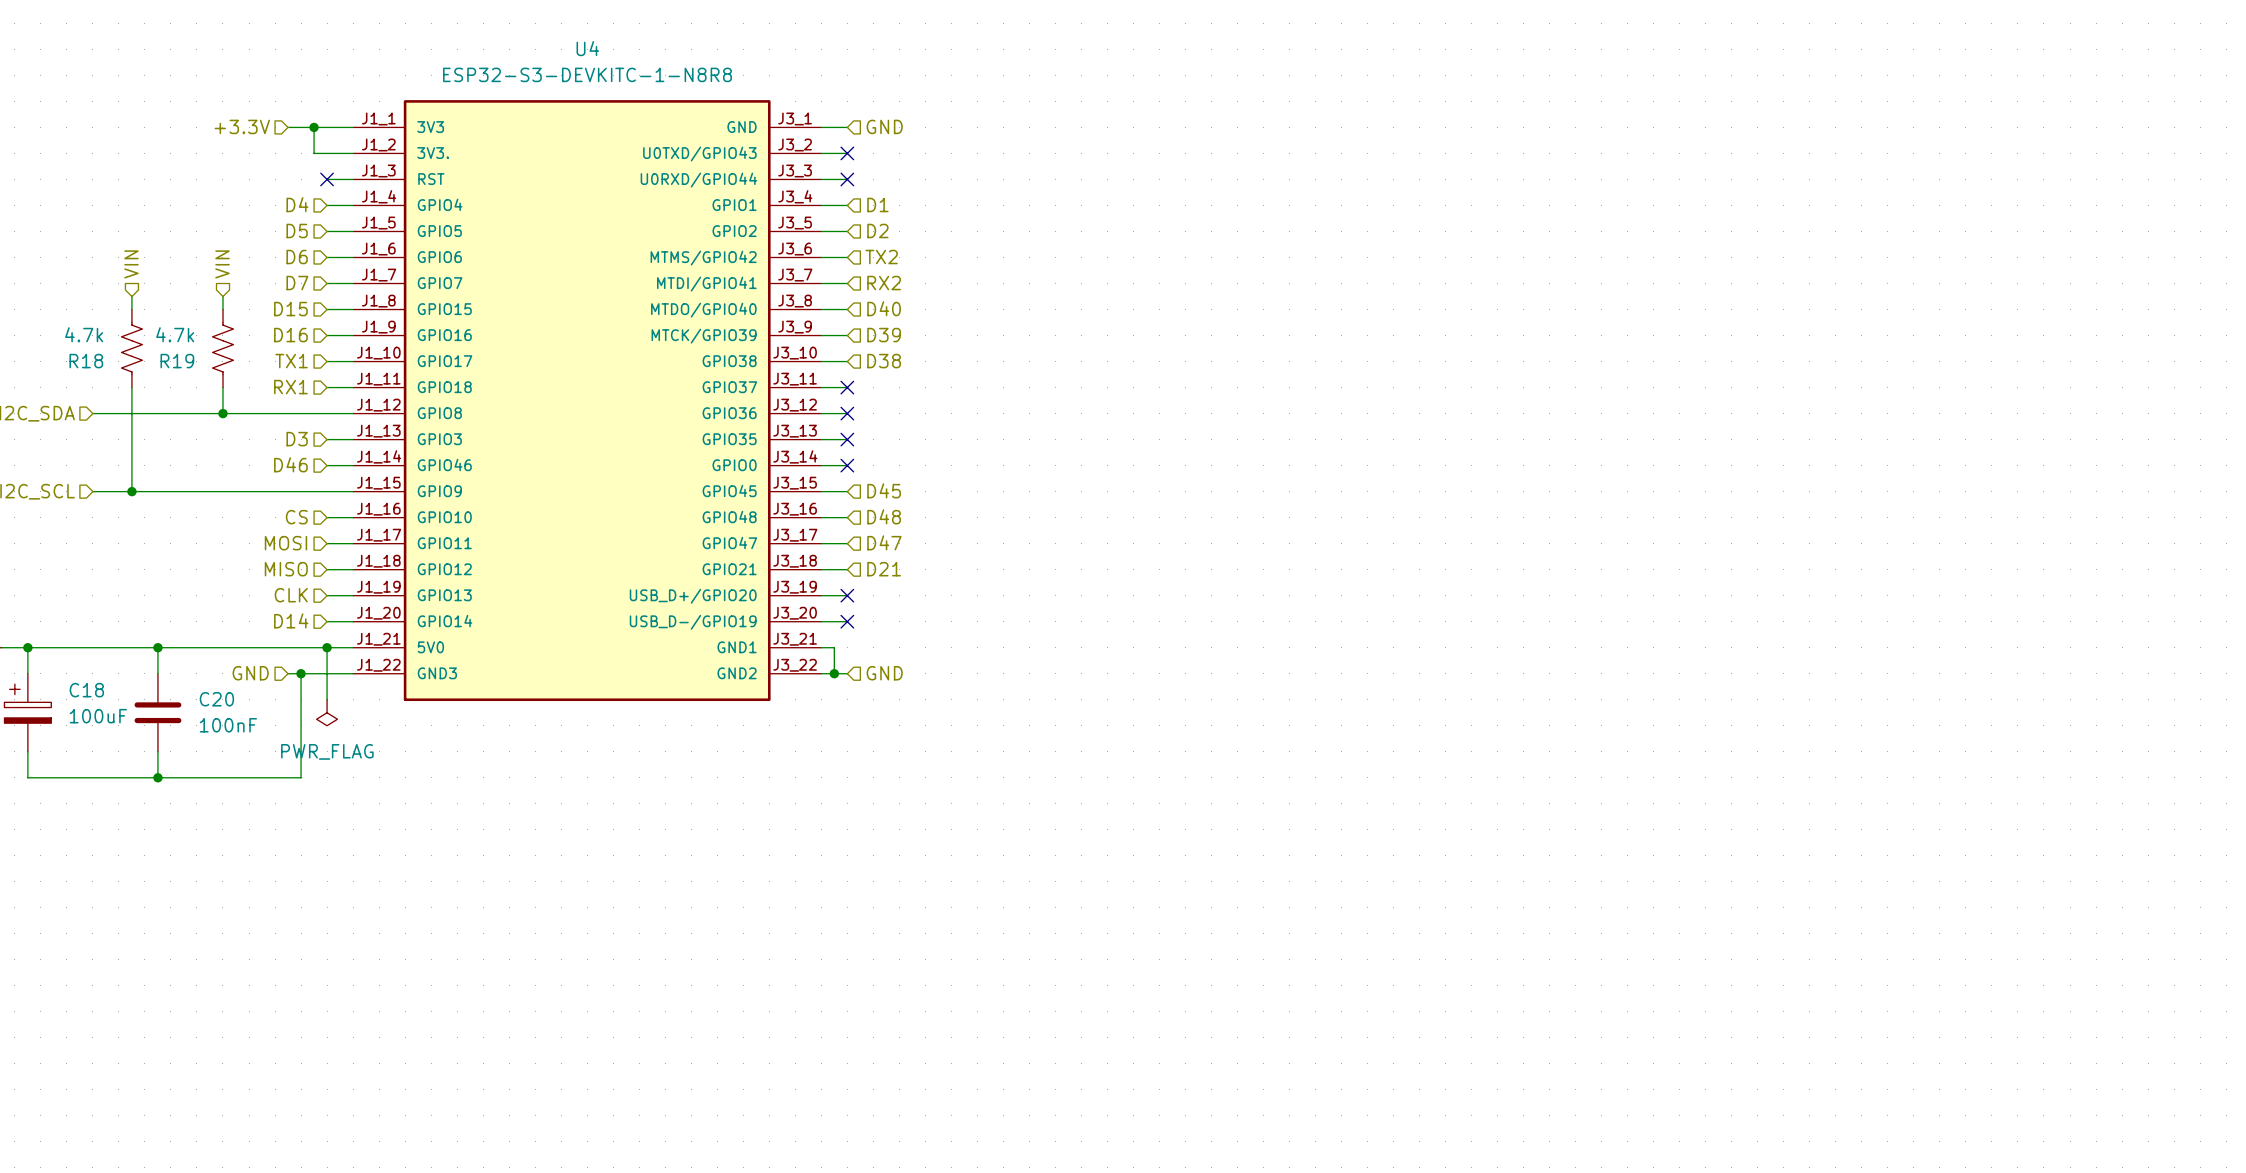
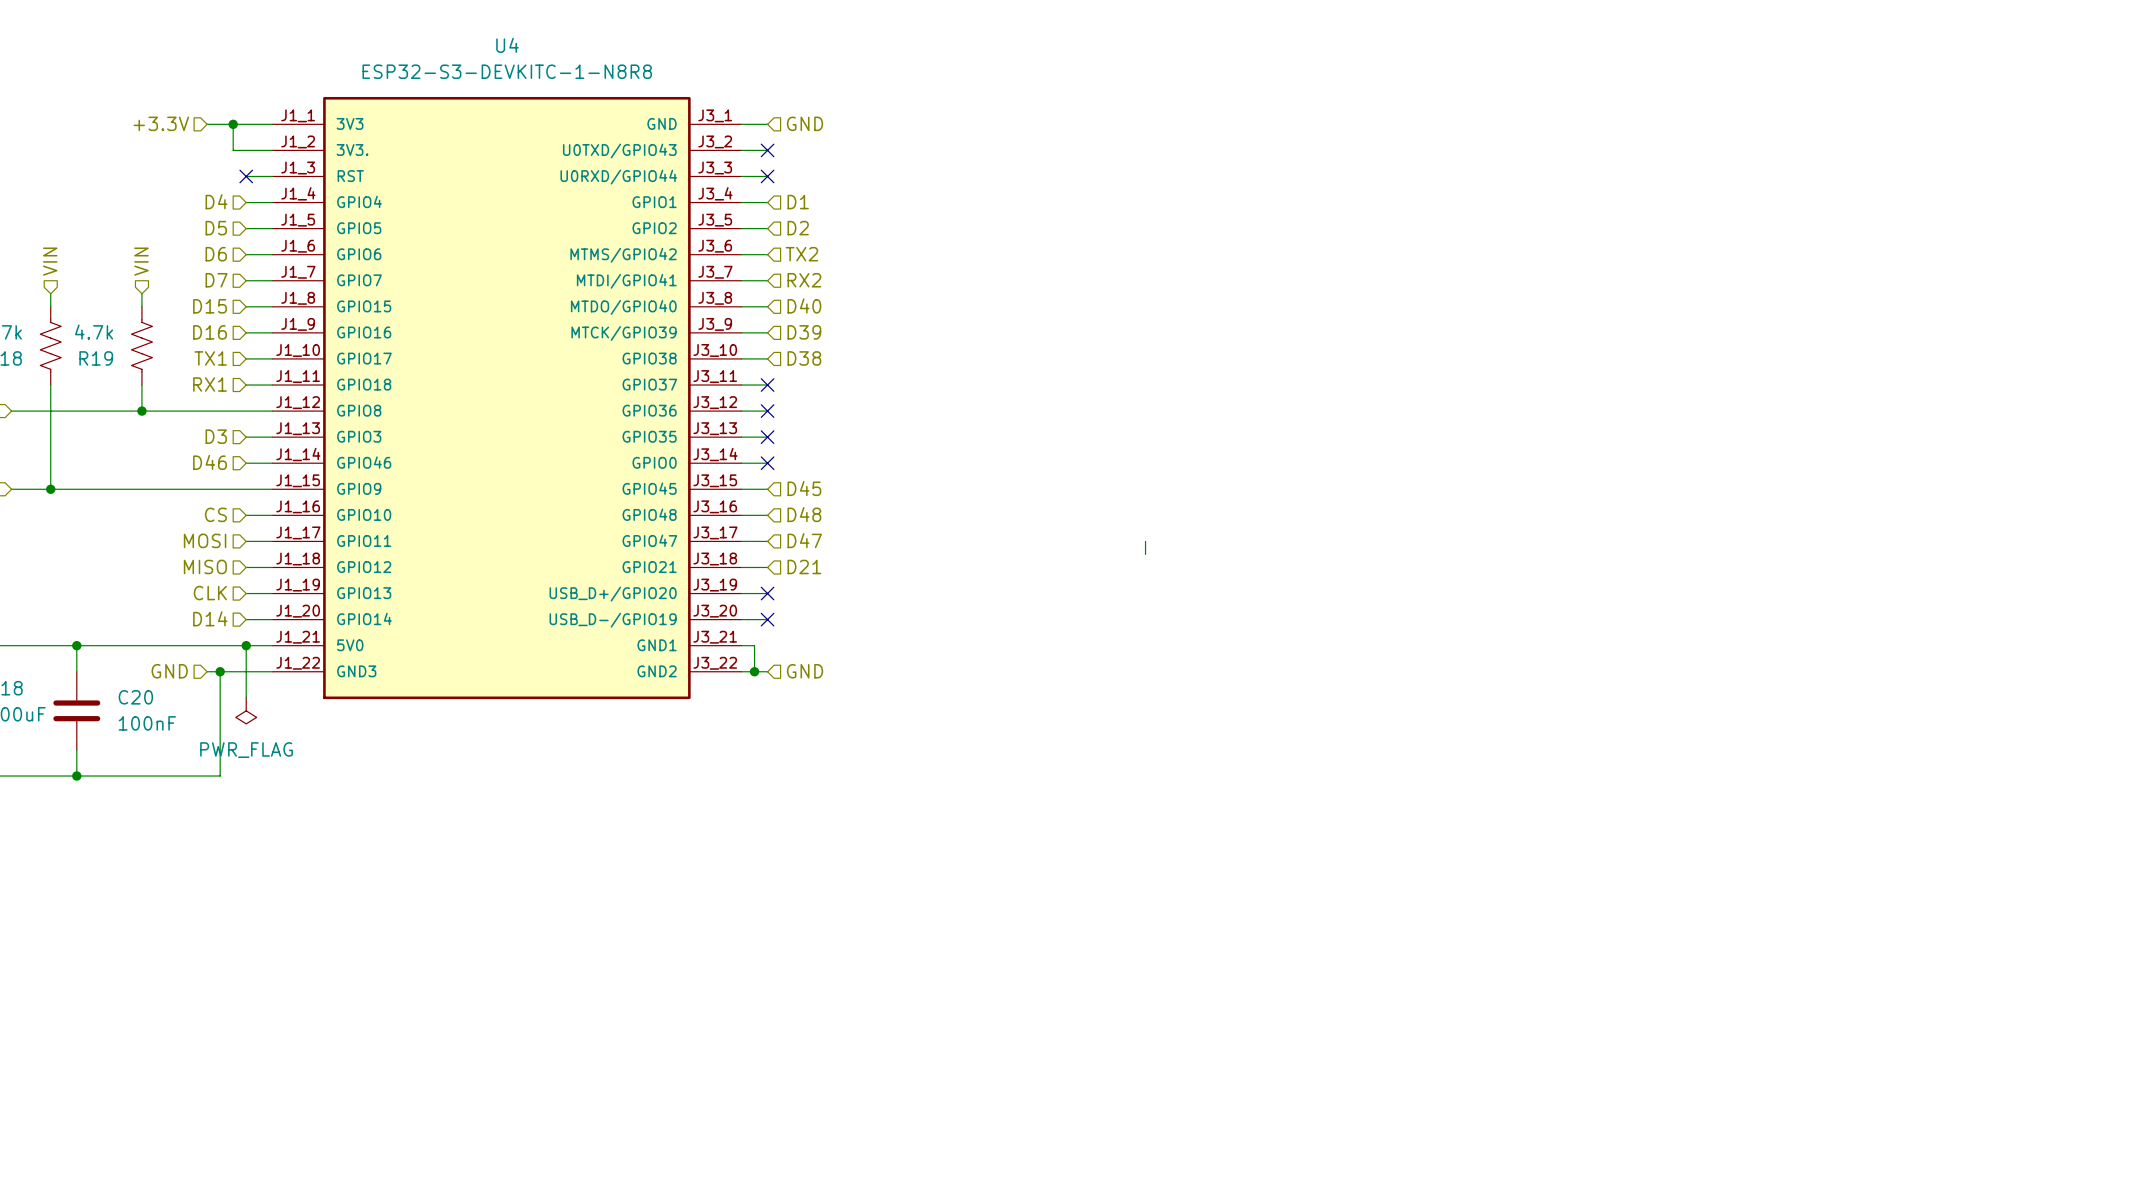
wire: none -> (1145, 541) (1145, 554)

